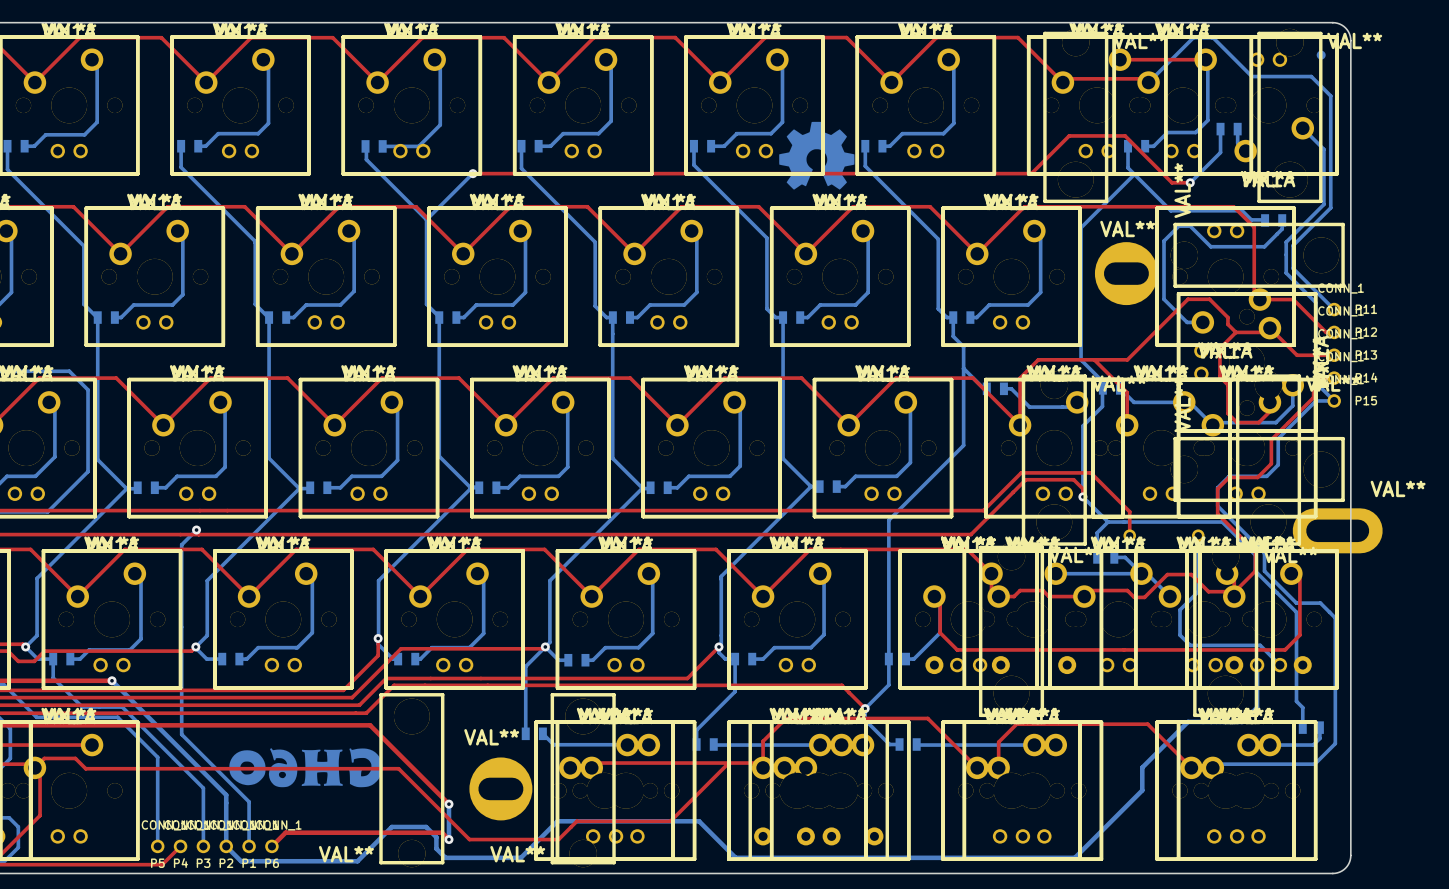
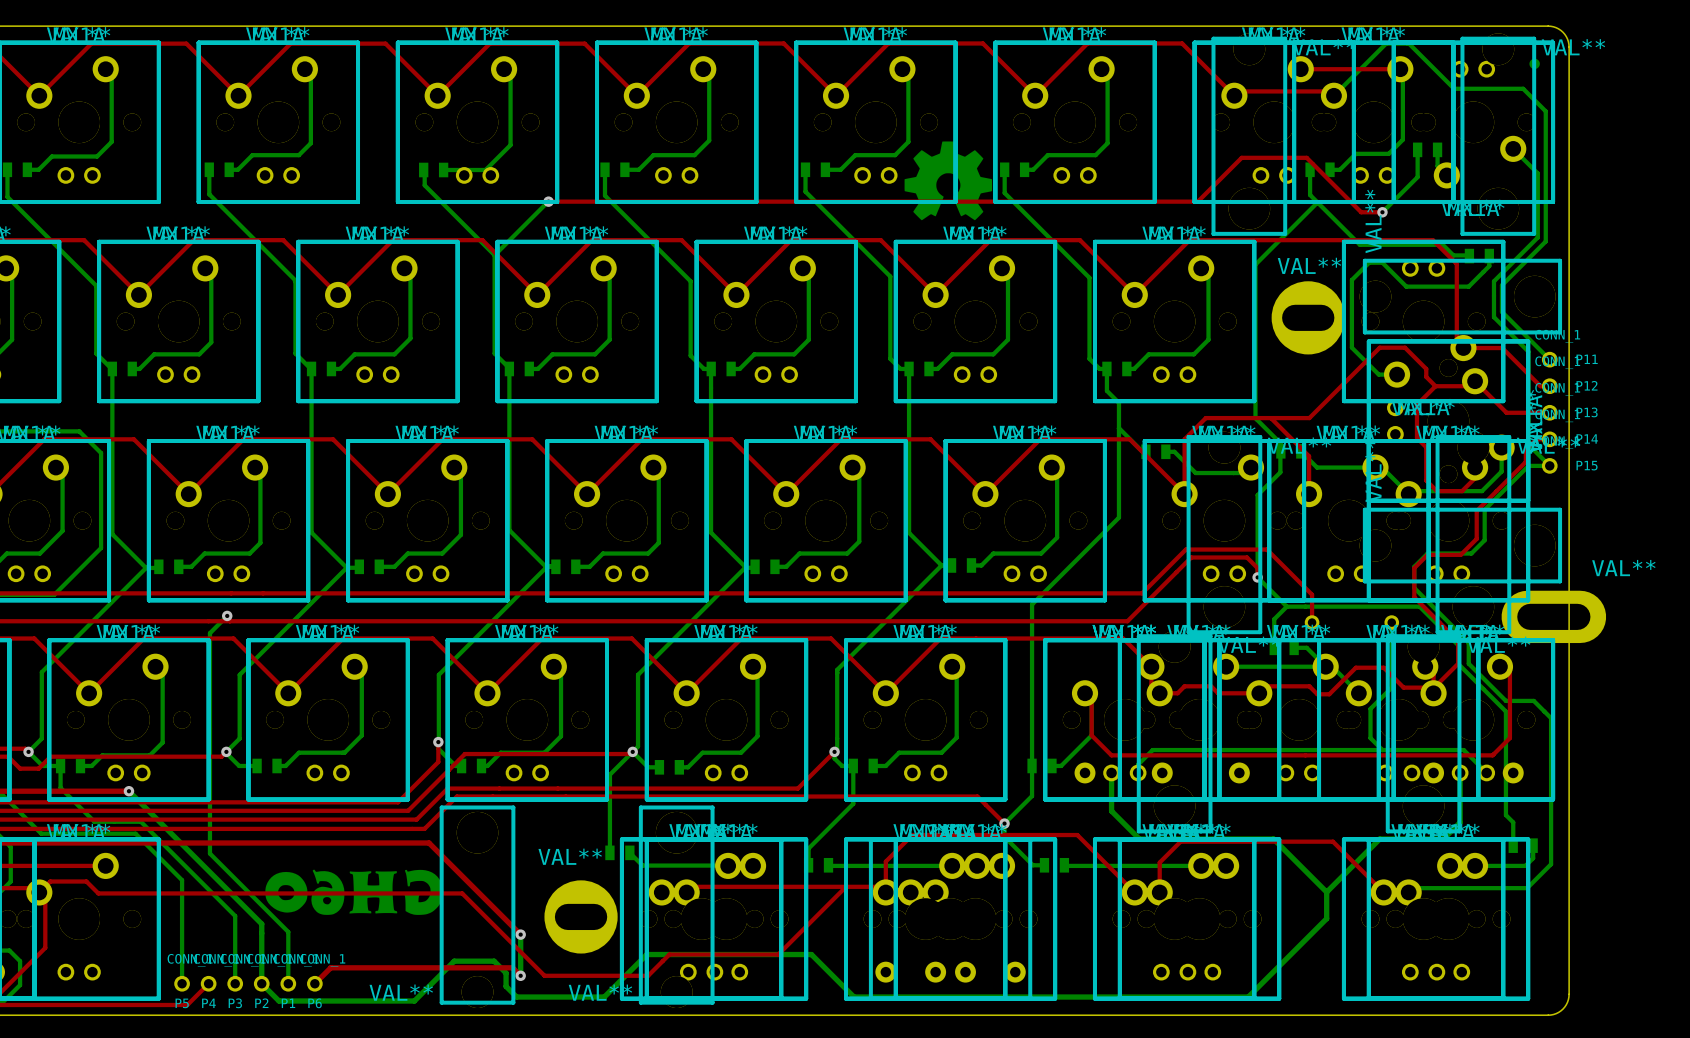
bottom track: none -> (1160, 750) (1152, 750) (1138, 764) (1138, 772)
bottom track: none -> (1161, 750) (1382, 750)
bottom track: none -> (1111, 772) (1111, 811) (1139, 839) (1273, 839) (1326, 892)

